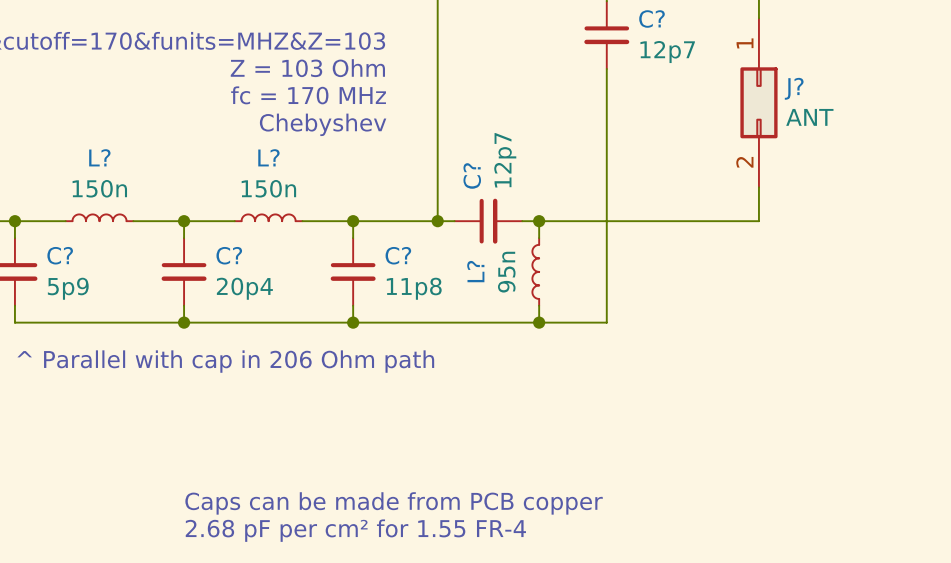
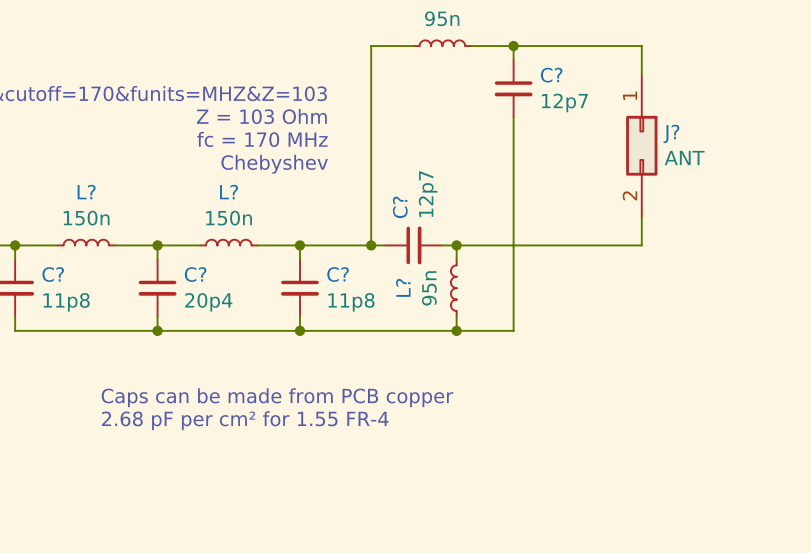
C? value: 5p9 (68, 288) -> 11p8 (66, 302)
text: ^ Parallel with cap in 206 Ohm path (225, 361) -> none
text position: Caps can be made from PCB copper (394, 503) -> Caps can be made from PCB copper (277, 397)
text position: 2.68 pF per cm² for 1.55 FR-4 (355, 530) -> 2.68 pF per cm² for 1.55 FR-4 (245, 420)

